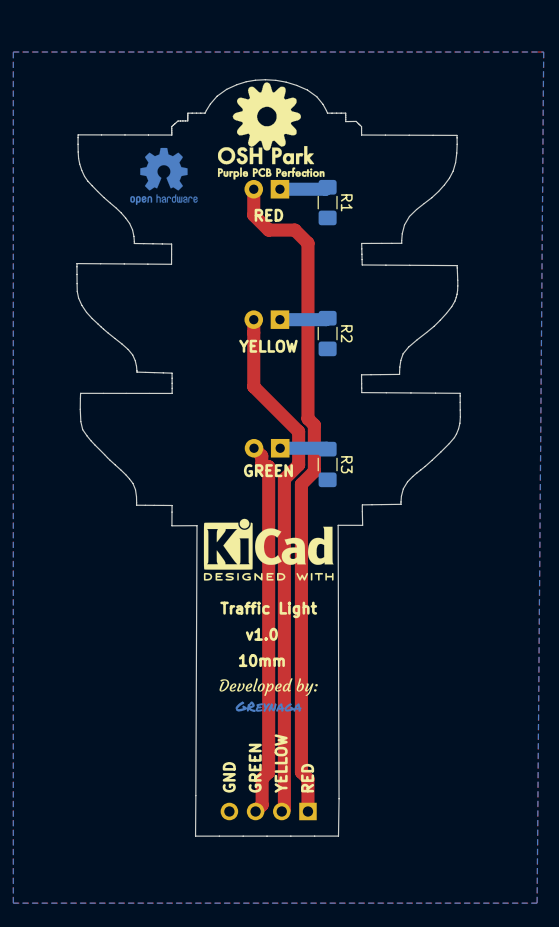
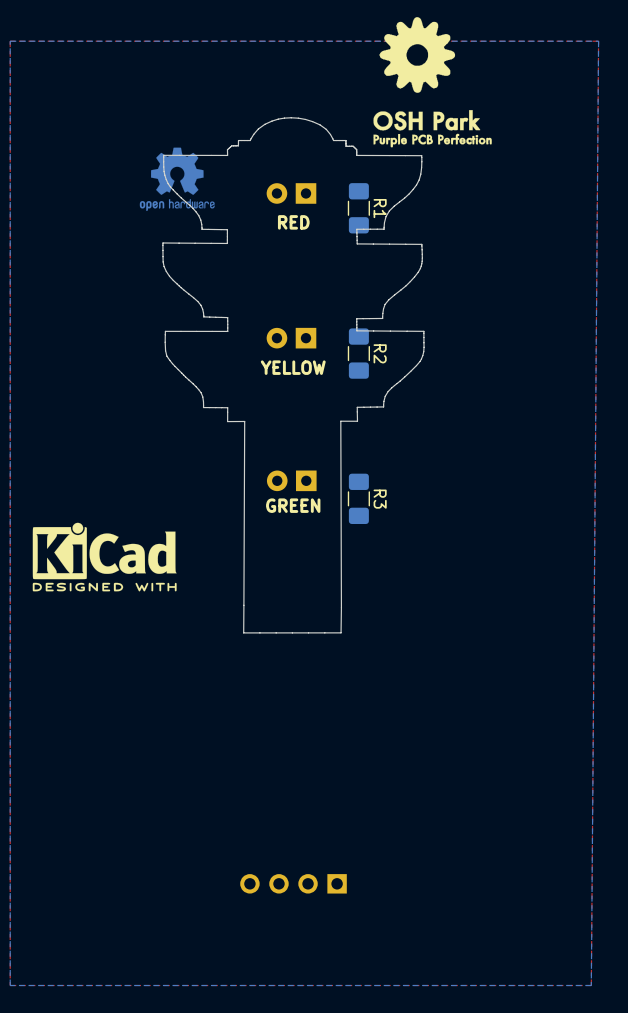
drawing: [76, 79, 461, 837] -> none
drawing position: (266, 116) -> (417, 54)
drawing: none -> [162, 117, 425, 634]
drawing position: (271, 162) -> (432, 128)
bottom track: (327, 187) (325, 189) (279, 189) -> none
top track: (253, 189) (253, 215) (268, 230) (294, 230) (307, 243) (307, 418) (314, 425) (314, 471) (301, 484) (301, 772) (307, 778) (307, 811) -> none
bottom track: (327, 318) (279, 319) -> none
top track: (253, 319) (253, 386) (298, 431) (298, 464) (284, 479) (284, 808) (281, 811) -> none
top track: (254, 448) (261, 455) (261, 464) (268, 466) (268, 772) (262, 778) (262, 804) (255, 811) -> none
bottom track: (280, 448) (327, 449) -> none
drawing position: (268, 549) -> (104, 557)
text: Traffic Light (268, 609) -> none
text: v1.0 (261, 634) -> none
text: 10mm (261, 660) -> none
text: YELLOW (281, 763) -> none
text: GREEN (255, 768) -> none
text: GND (229, 777) -> none
text: RED (307, 778) -> none

